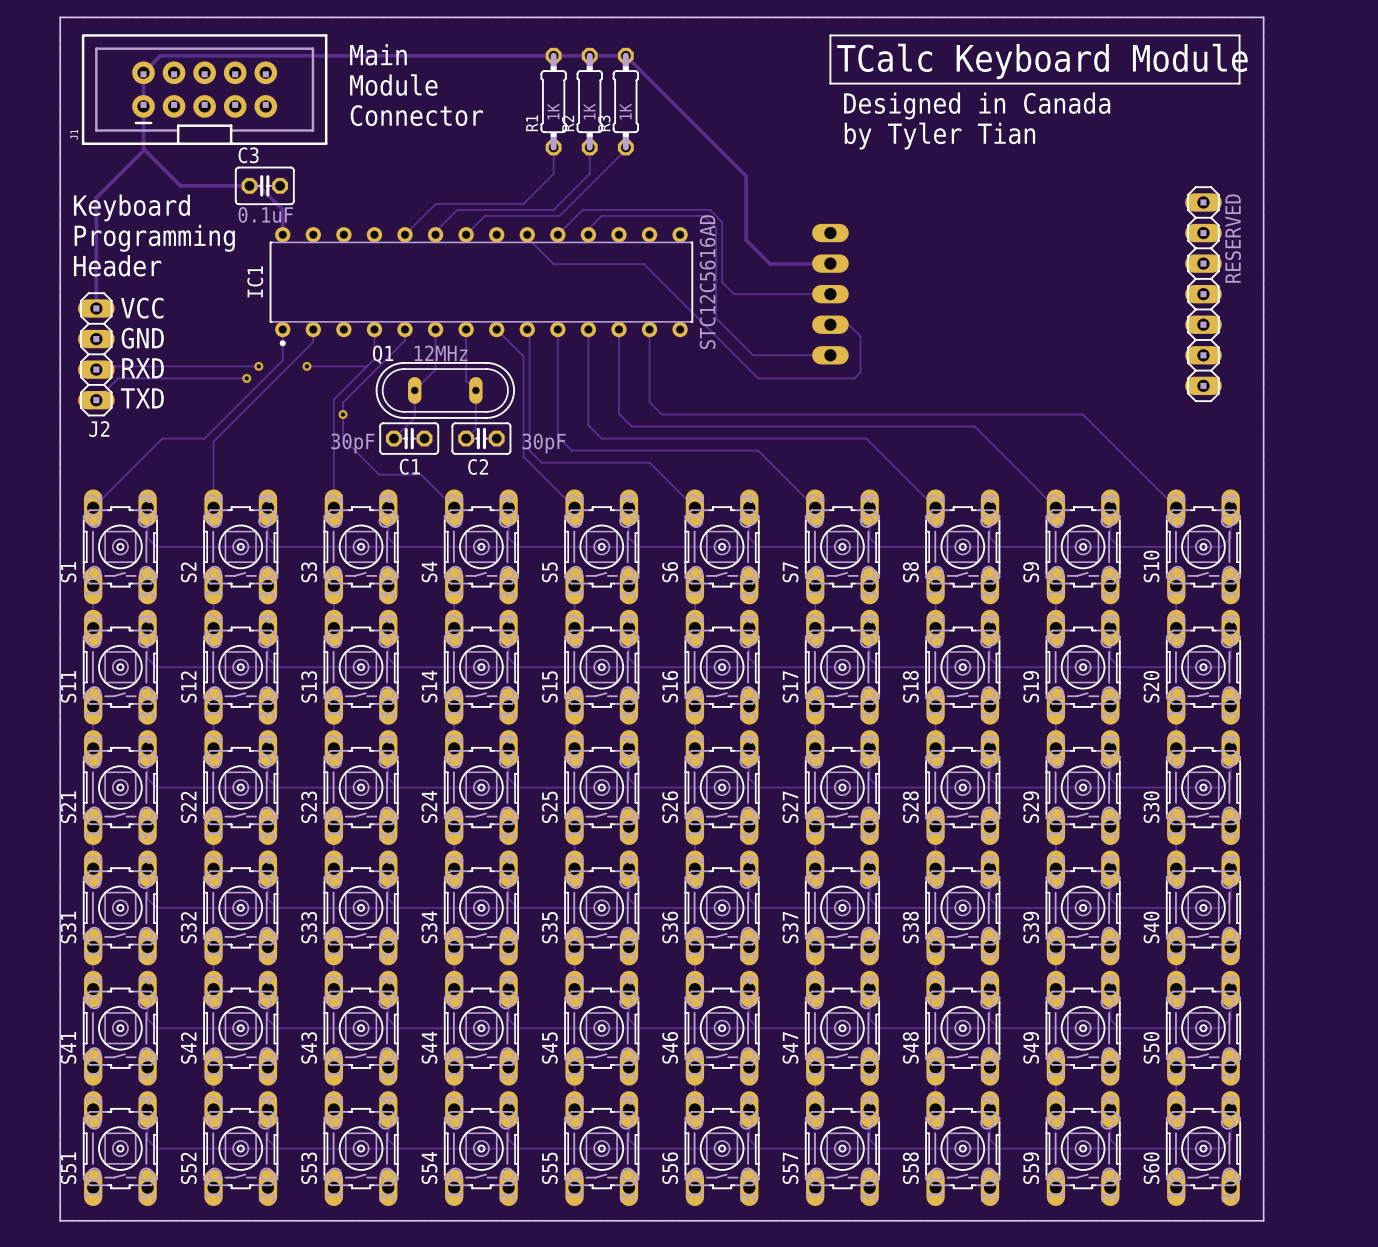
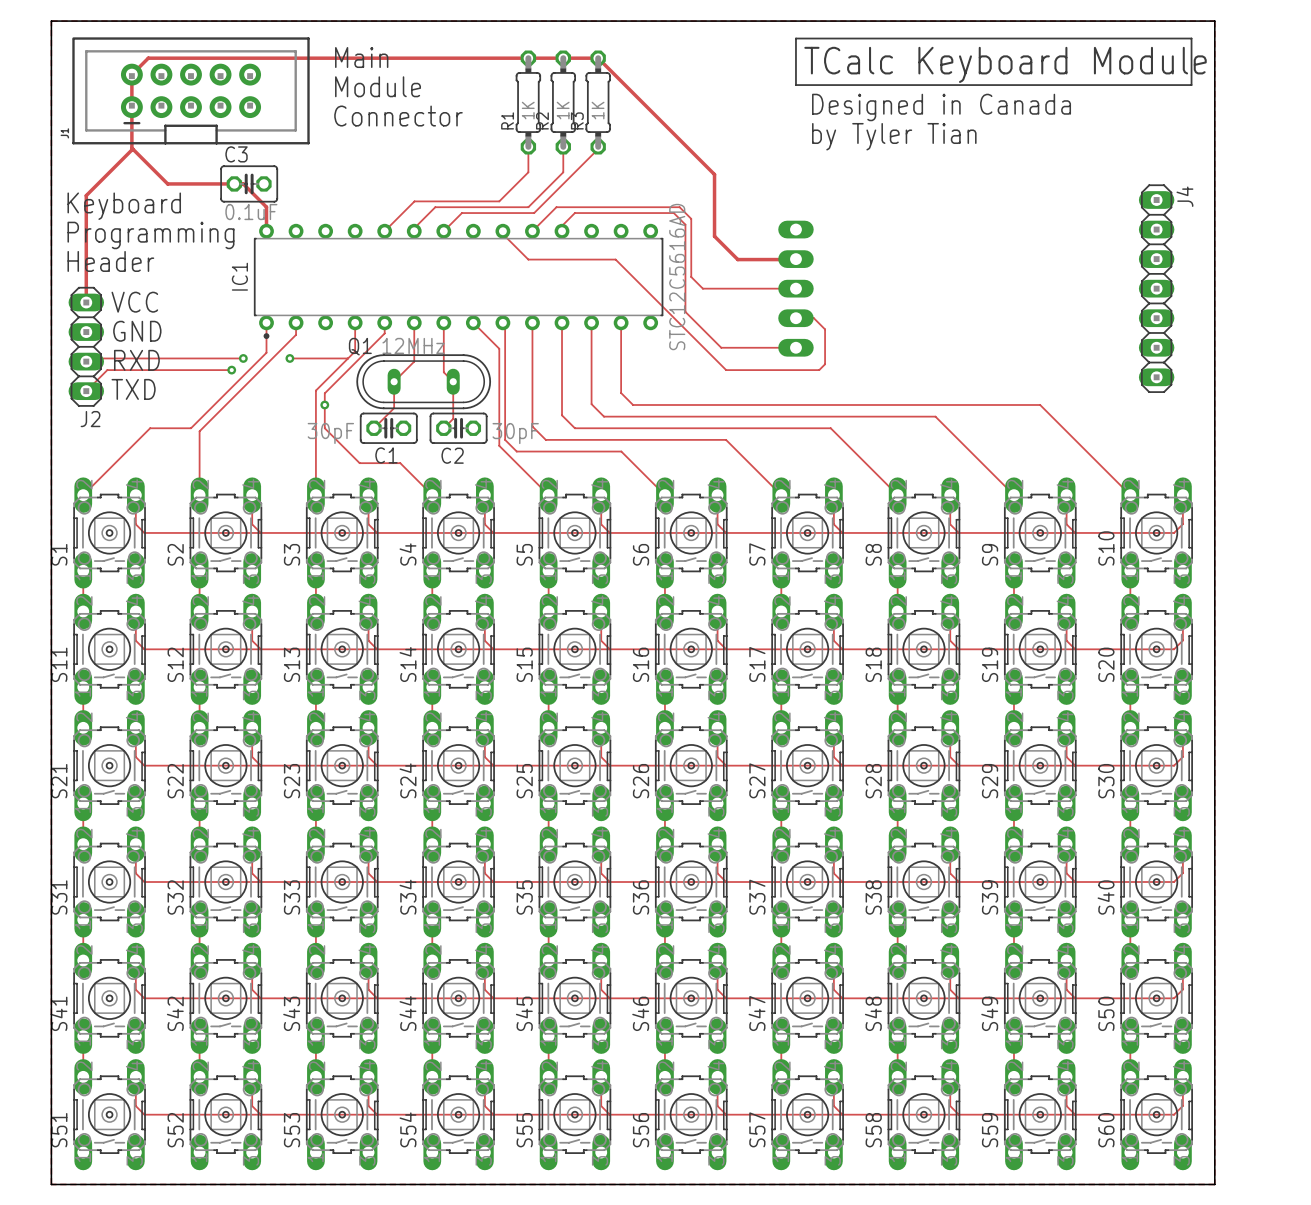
J4 name: none -> J4 (1184, 196)
J4 value: RESERVED (1233, 238) -> none

